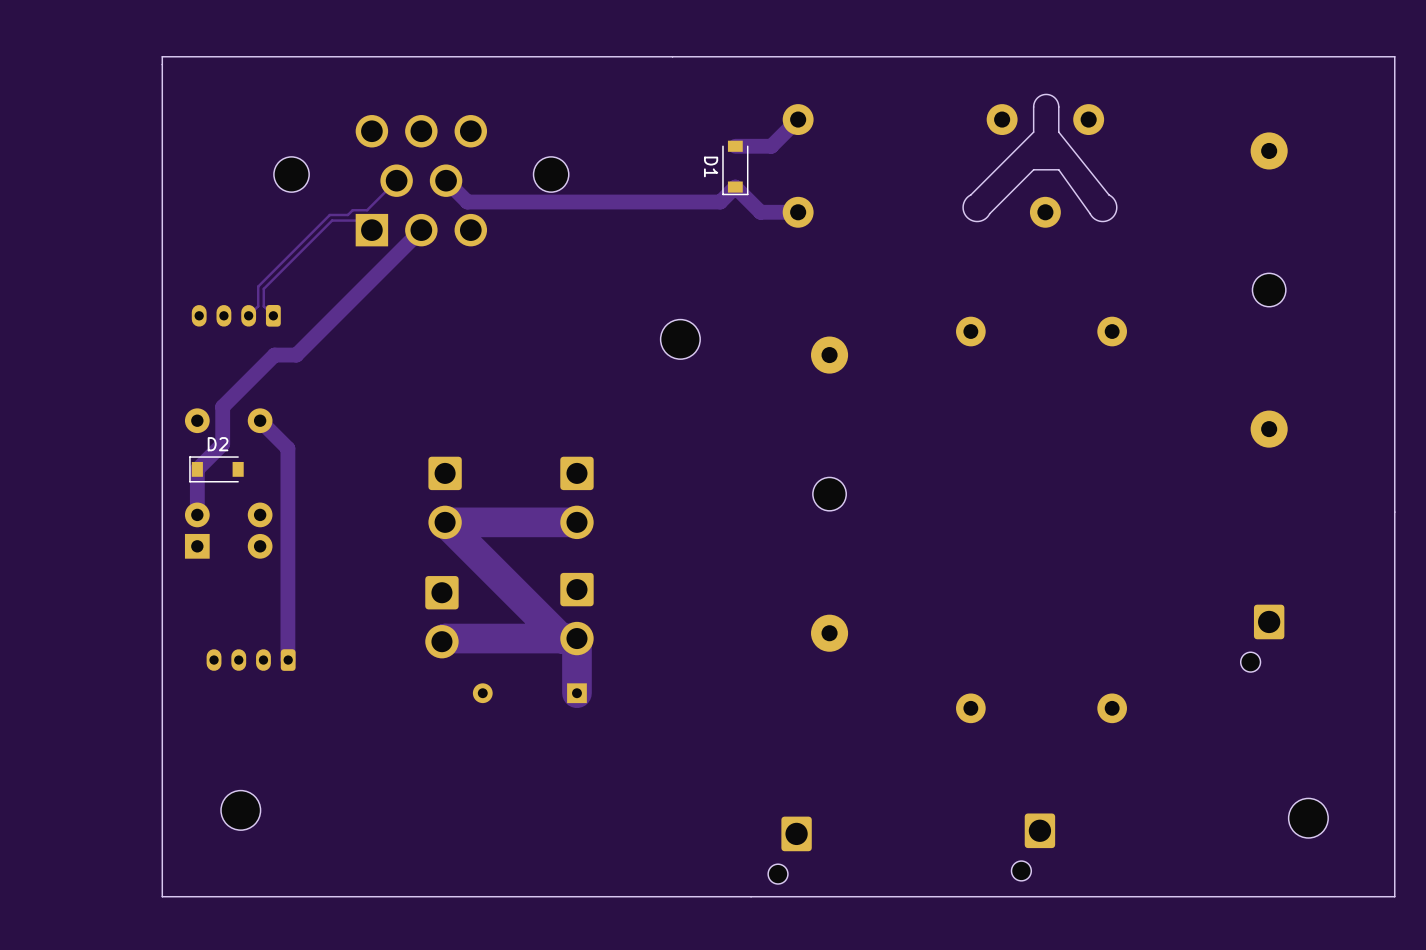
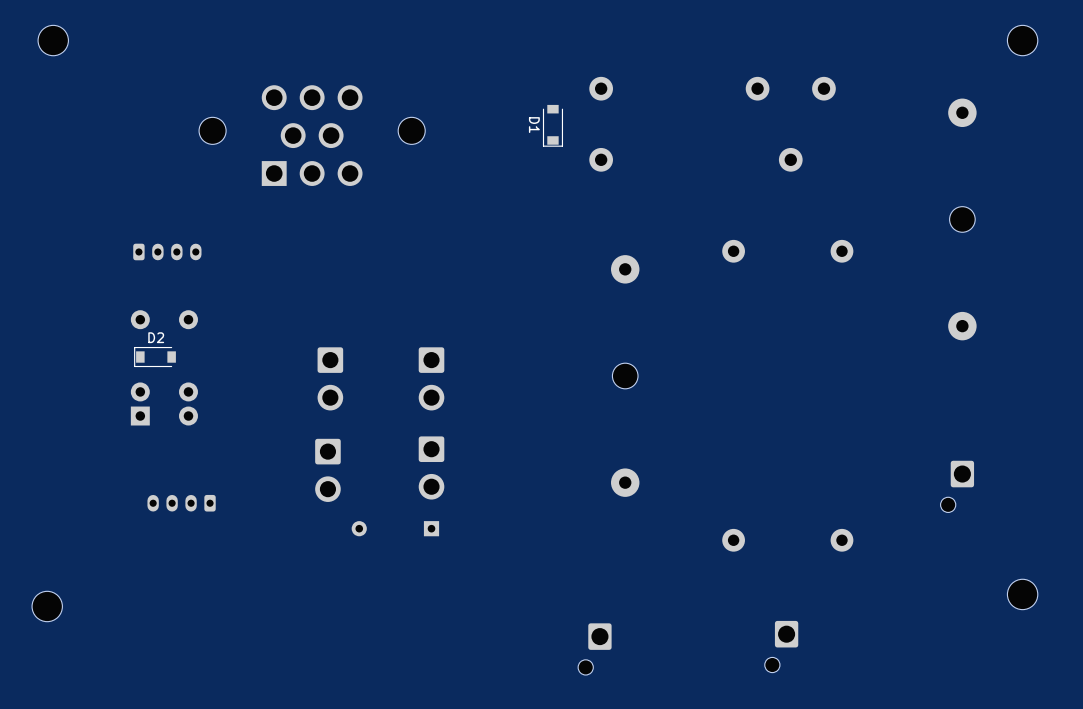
part: none -> (53, 40)
part: none -> (1022, 40)
board edge: (1394, 56) (162, 56) (162, 896) (1394, 896) (1394, 56) -> none
board edge: (1058, 107) (1058, 132) (1114, 199) (1116, 207) (1113, 216) (1103, 221) (1093, 217) (1058, 169) (1033, 169) (985, 219) (976, 221) (968, 218) (963, 209) (965, 199) (1033, 132) (1033, 105) (1036, 99) (1042, 94) (1051, 95) (1056, 99) (1058, 107) -> none
track: (798, 119) (771, 146) (735, 146) -> none
track: (396, 180) (367, 210) (352, 210) (347, 215) (329, 215) (258, 286) (258, 306) (248, 315) -> none
track: (446, 180) (467, 202) (720, 202) (735, 187) (760, 212) (798, 212) -> none
track: (371, 230) (362, 220) (332, 220) (263, 288) (263, 306) (273, 315) -> none
track: (421, 230) (296, 355) (274, 355) (222, 406) (222, 444) (197, 469) (197, 514) -> none
part rotation: 0° (236, 315) -> 180° (167, 251)
part: (680, 339) -> none
track: (260, 420) (287, 448) (288, 660) -> none
track: (576, 522) (445, 522) (561, 638) -> none
track: (441, 641) (445, 638) (576, 638) (576, 693) -> none
part position: (240, 810) -> (47, 606)
part position: (1308, 818) -> (1022, 594)

